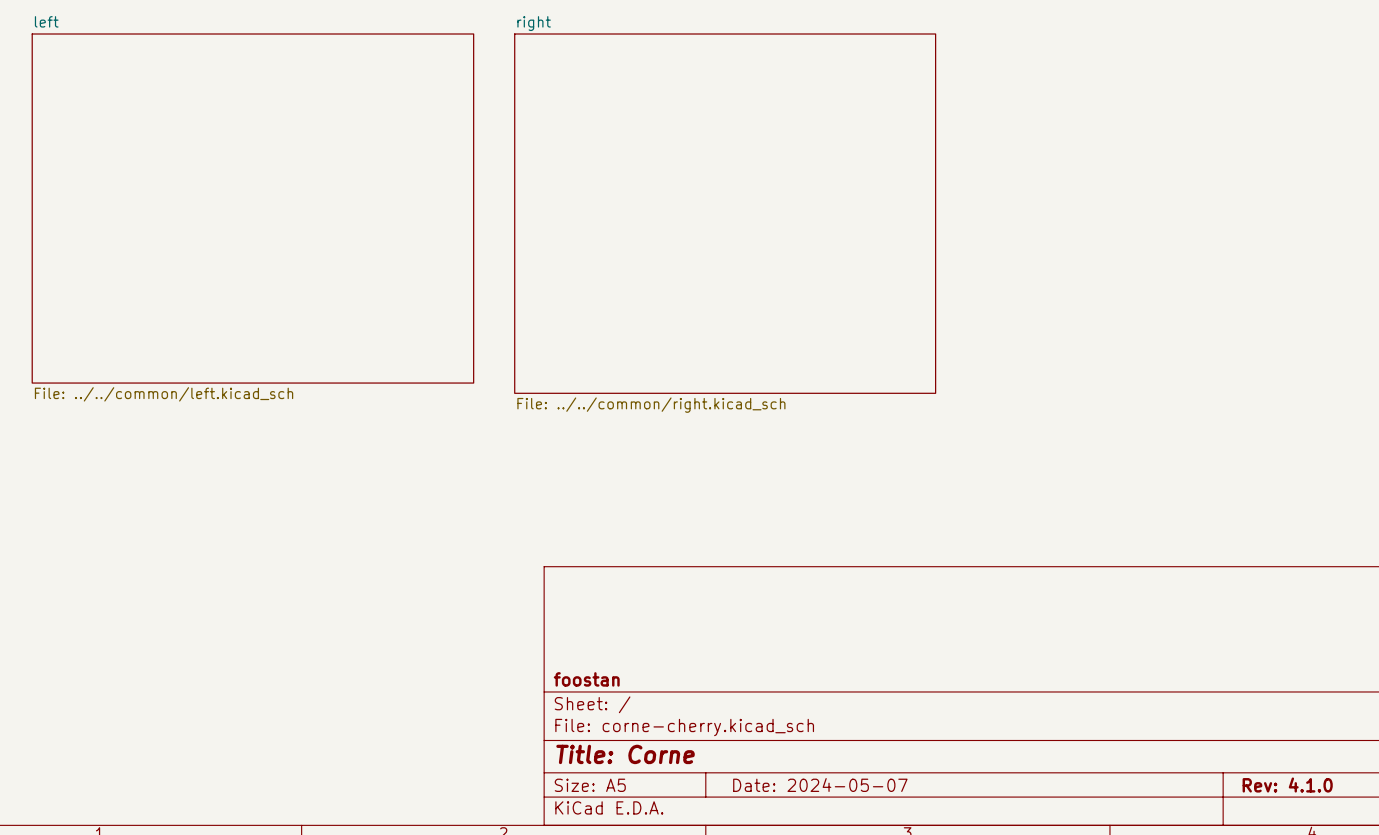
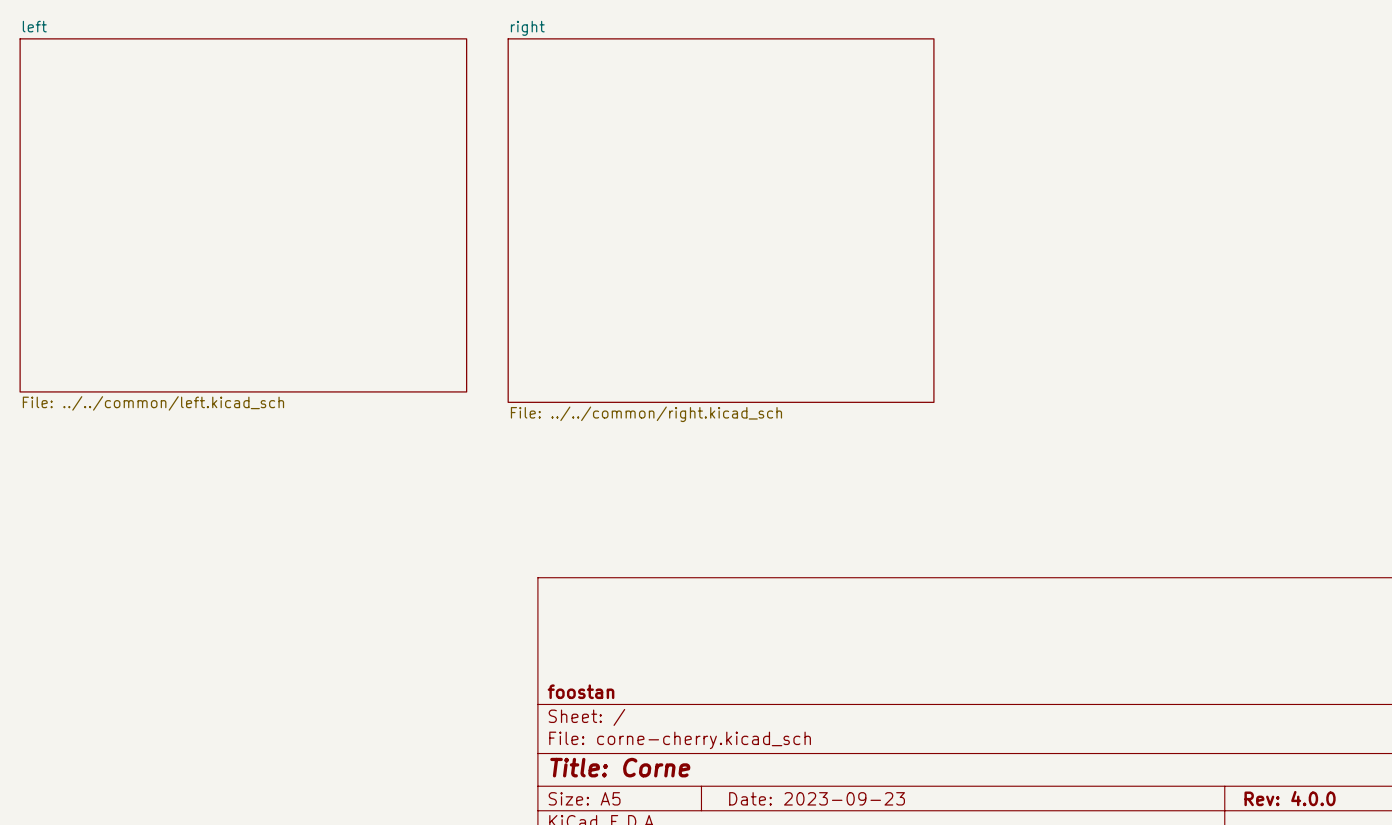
title block: Date: 2024-05-07 (820, 785) -> Date: 2023-09-23 (817, 798)
title block: Rev: 4.1.0 (1287, 785) -> Rev: 4.0.0 (1290, 798)

